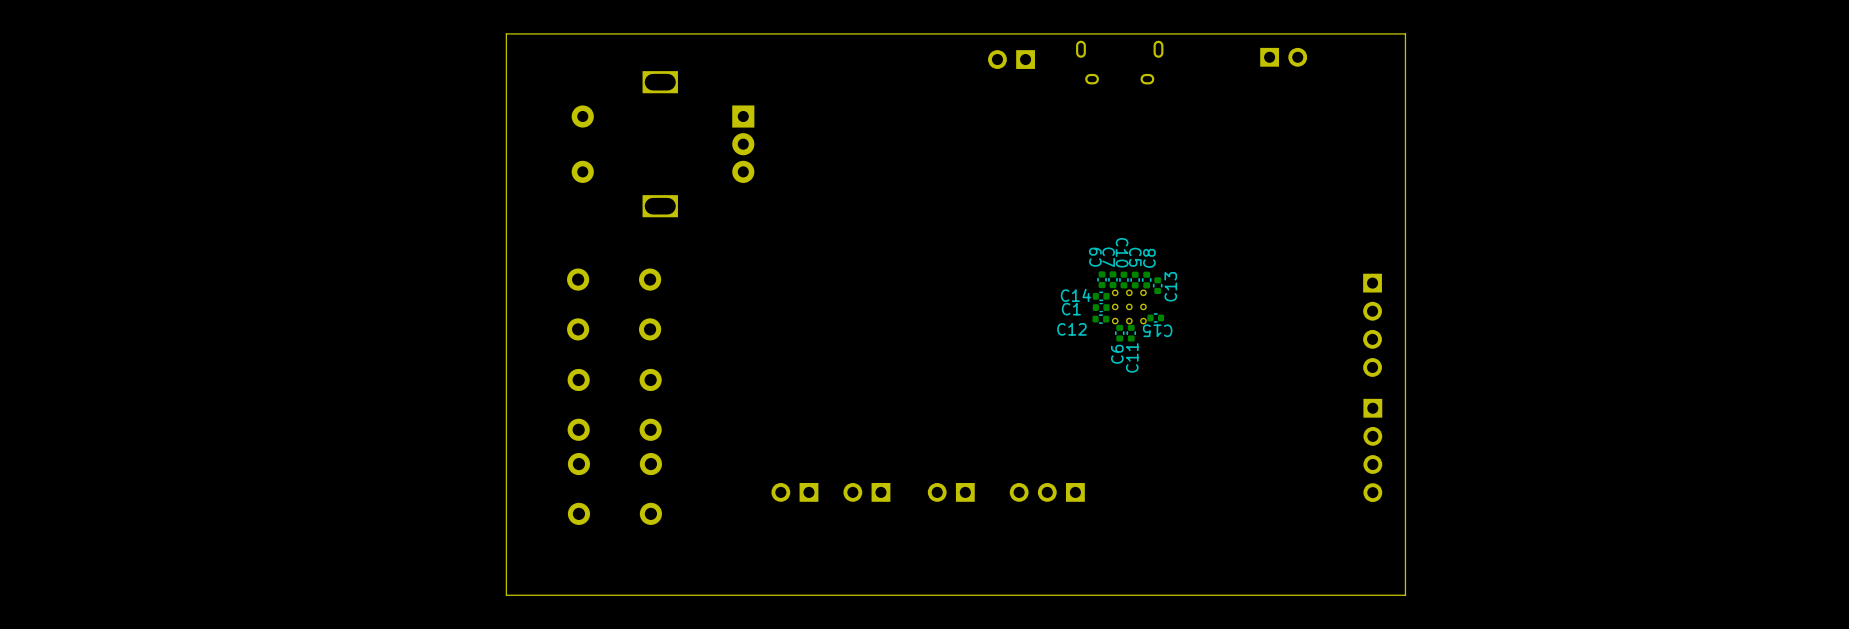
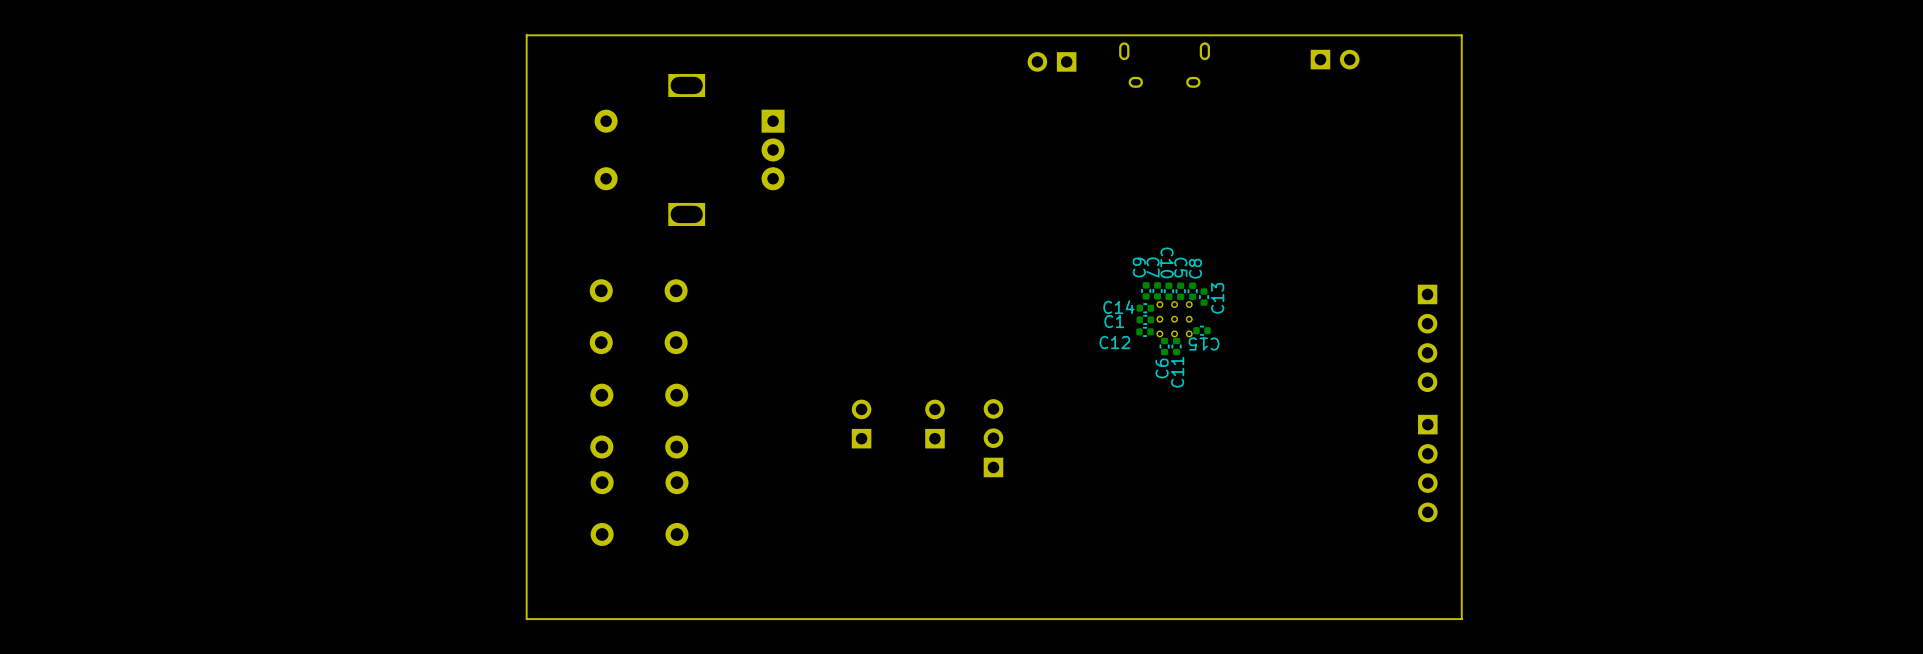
part: none -> (861, 424)
part: none -> (934, 424)
part: (794, 492) -> none
part: (866, 492) -> none
part: (951, 492) -> none
part rotation: 0° (1047, 492) -> 90° clockwise (993, 438)
part position: (1047, 492) -> (993, 438)

